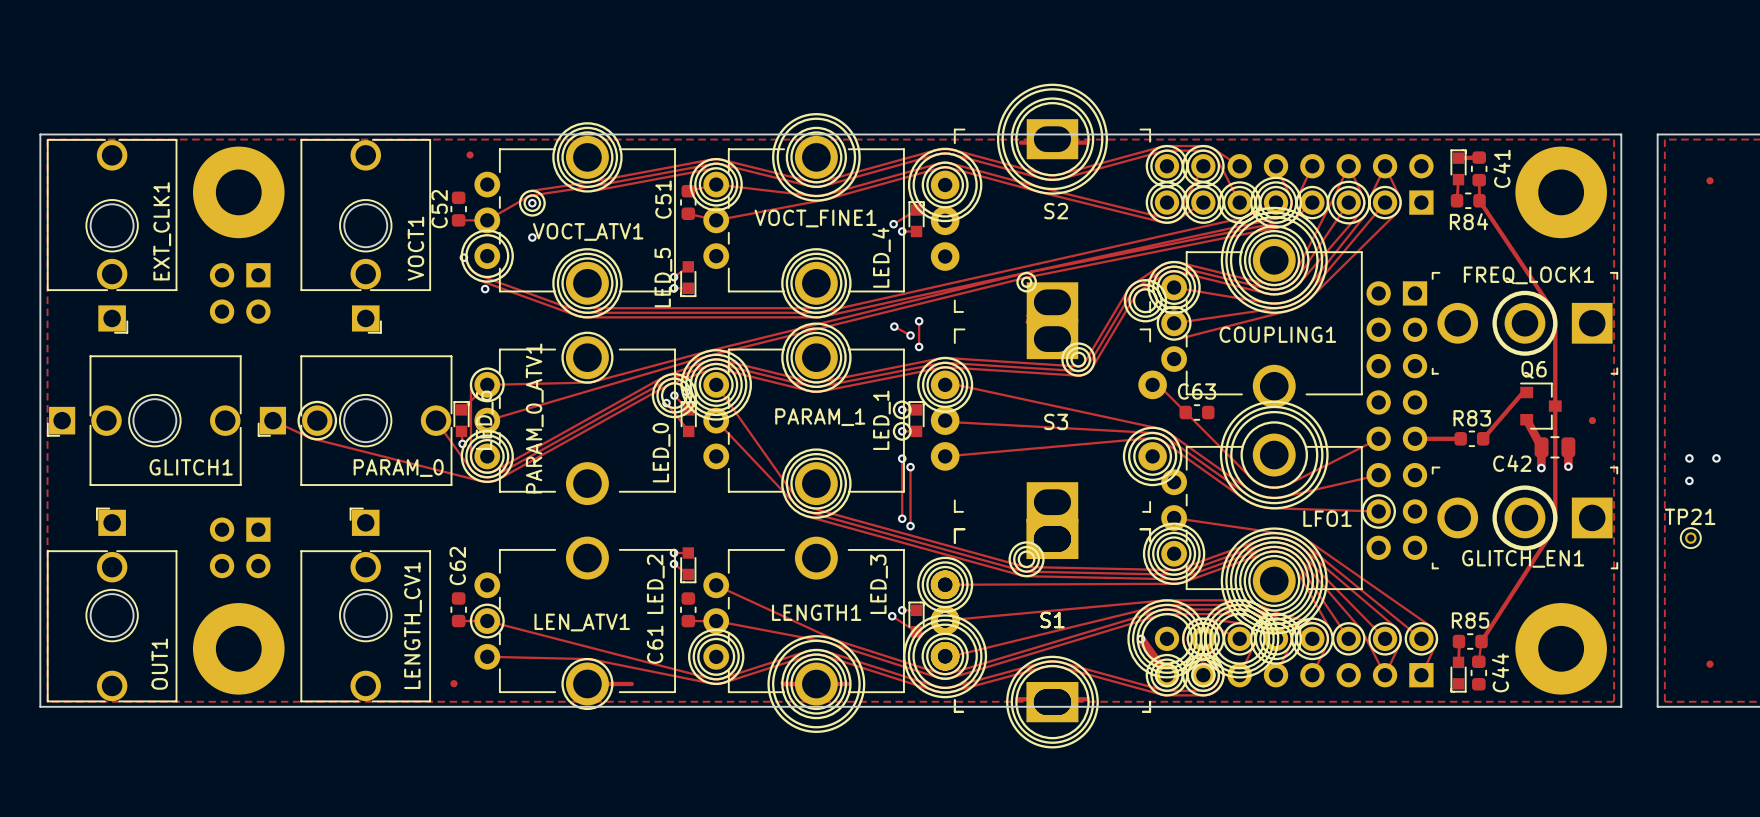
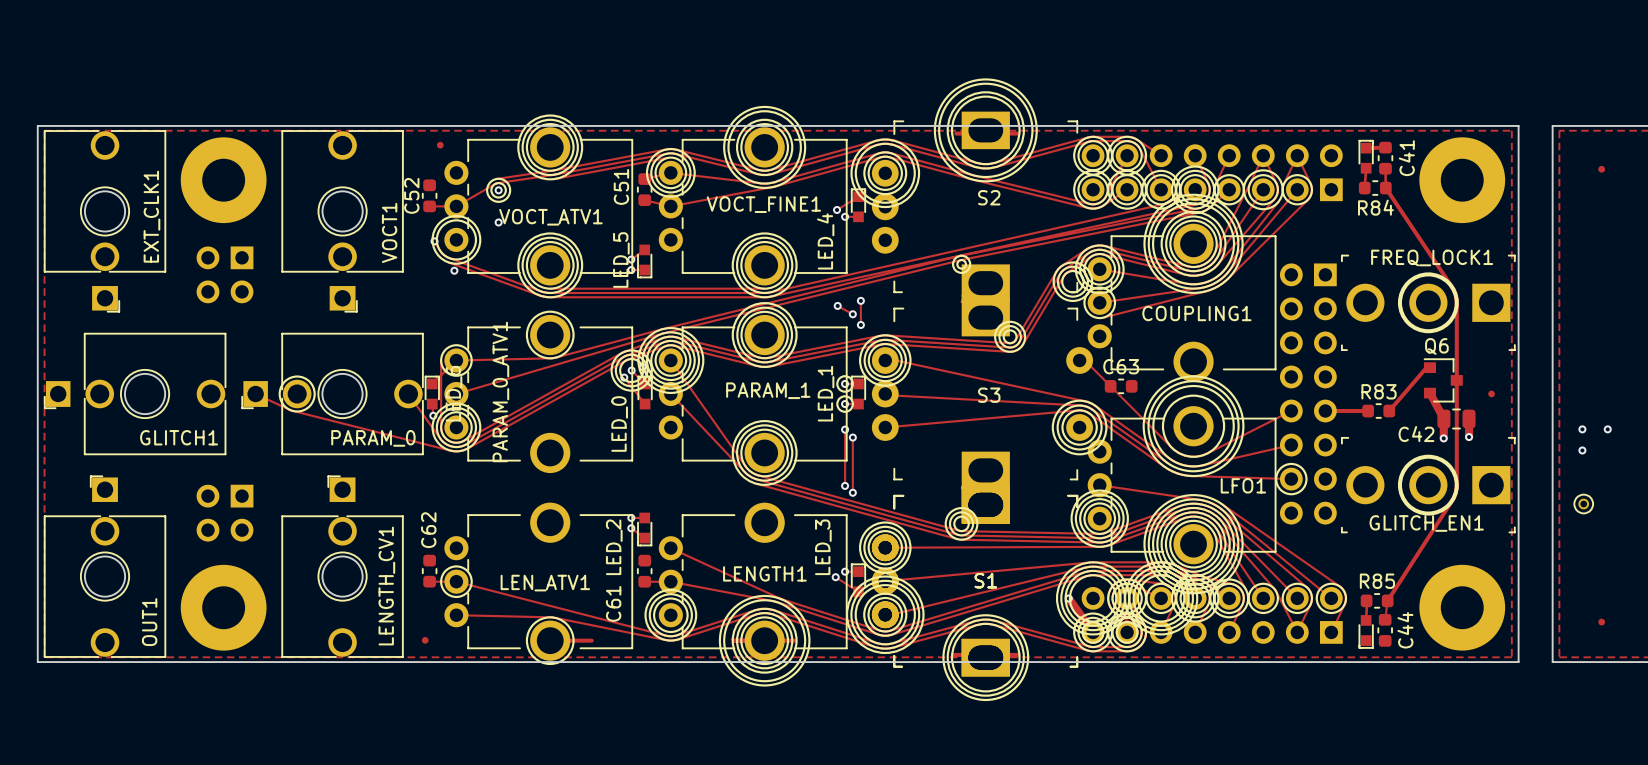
TP21 name: TP21 (1690, 516) -> none

